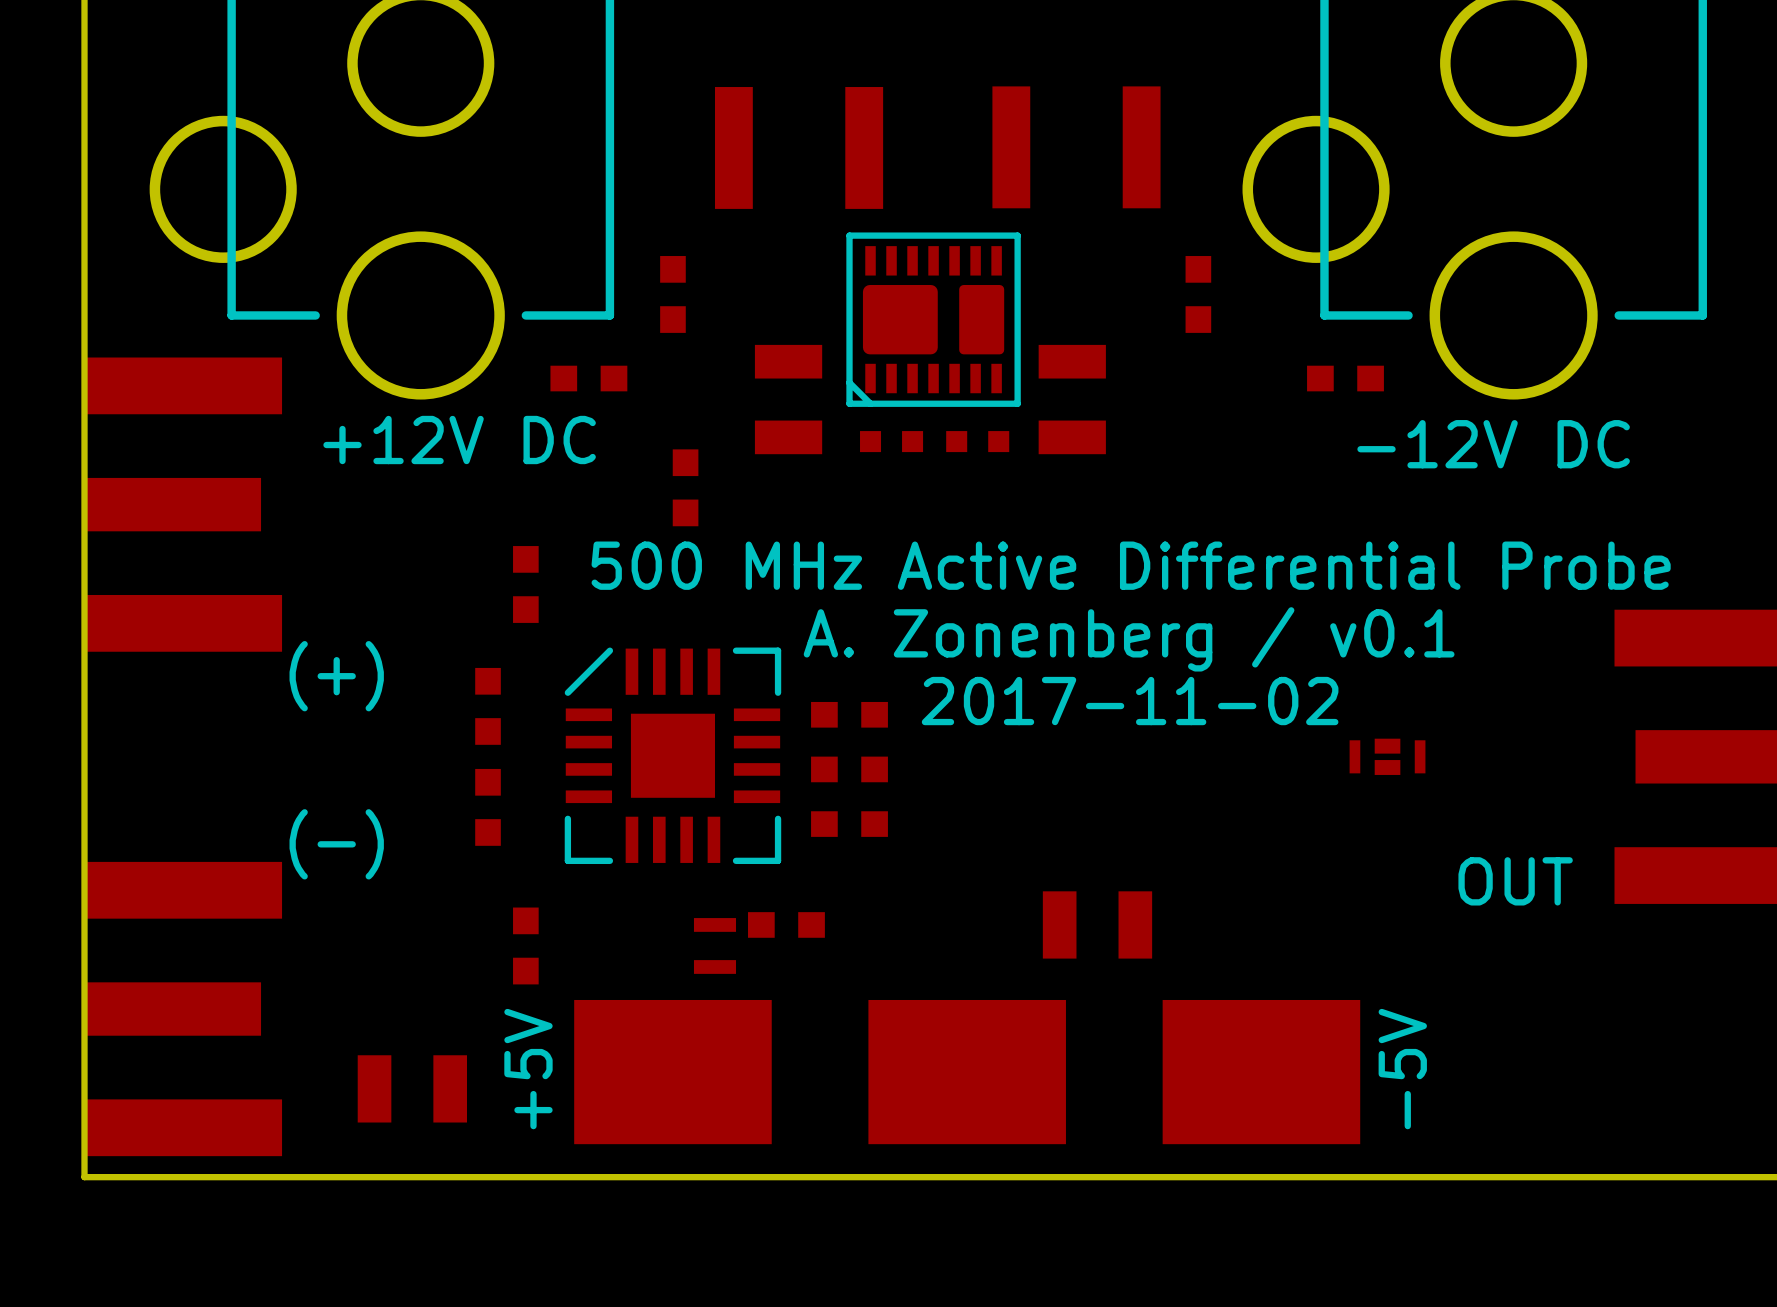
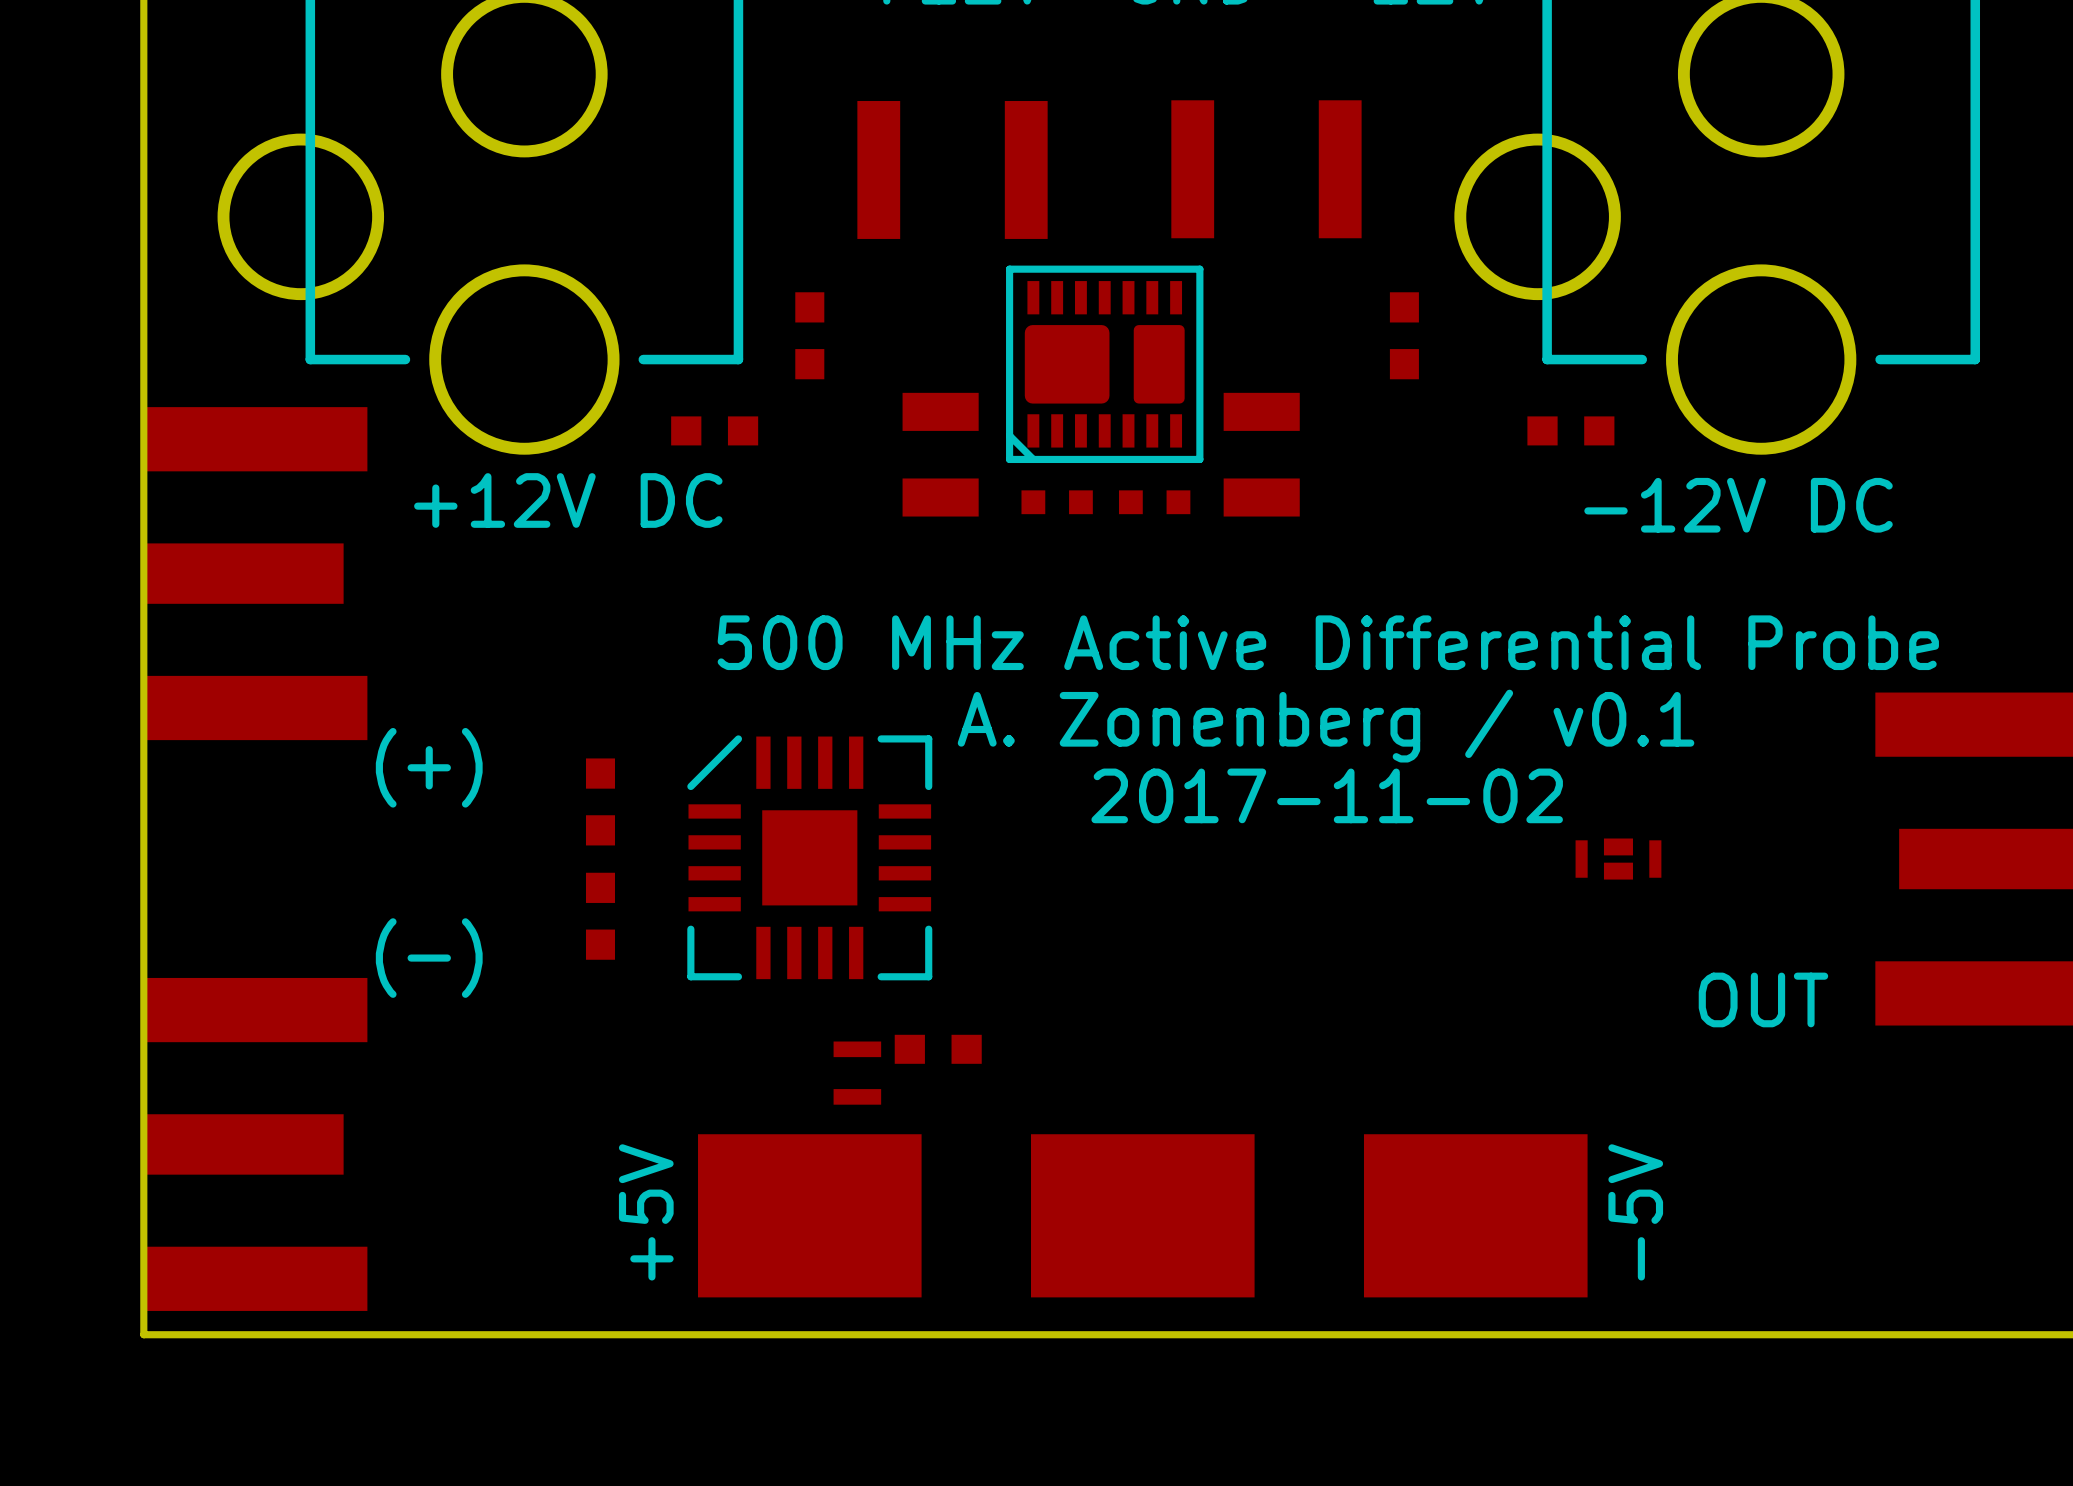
part: (685, 487) -> none
part: (525, 584) -> none
part: (849, 714) -> none
part: (849, 769) -> none
part: (849, 824) -> none
part: (1097, 924) -> none
part: (525, 945) -> none
part: (412, 1088) -> none

